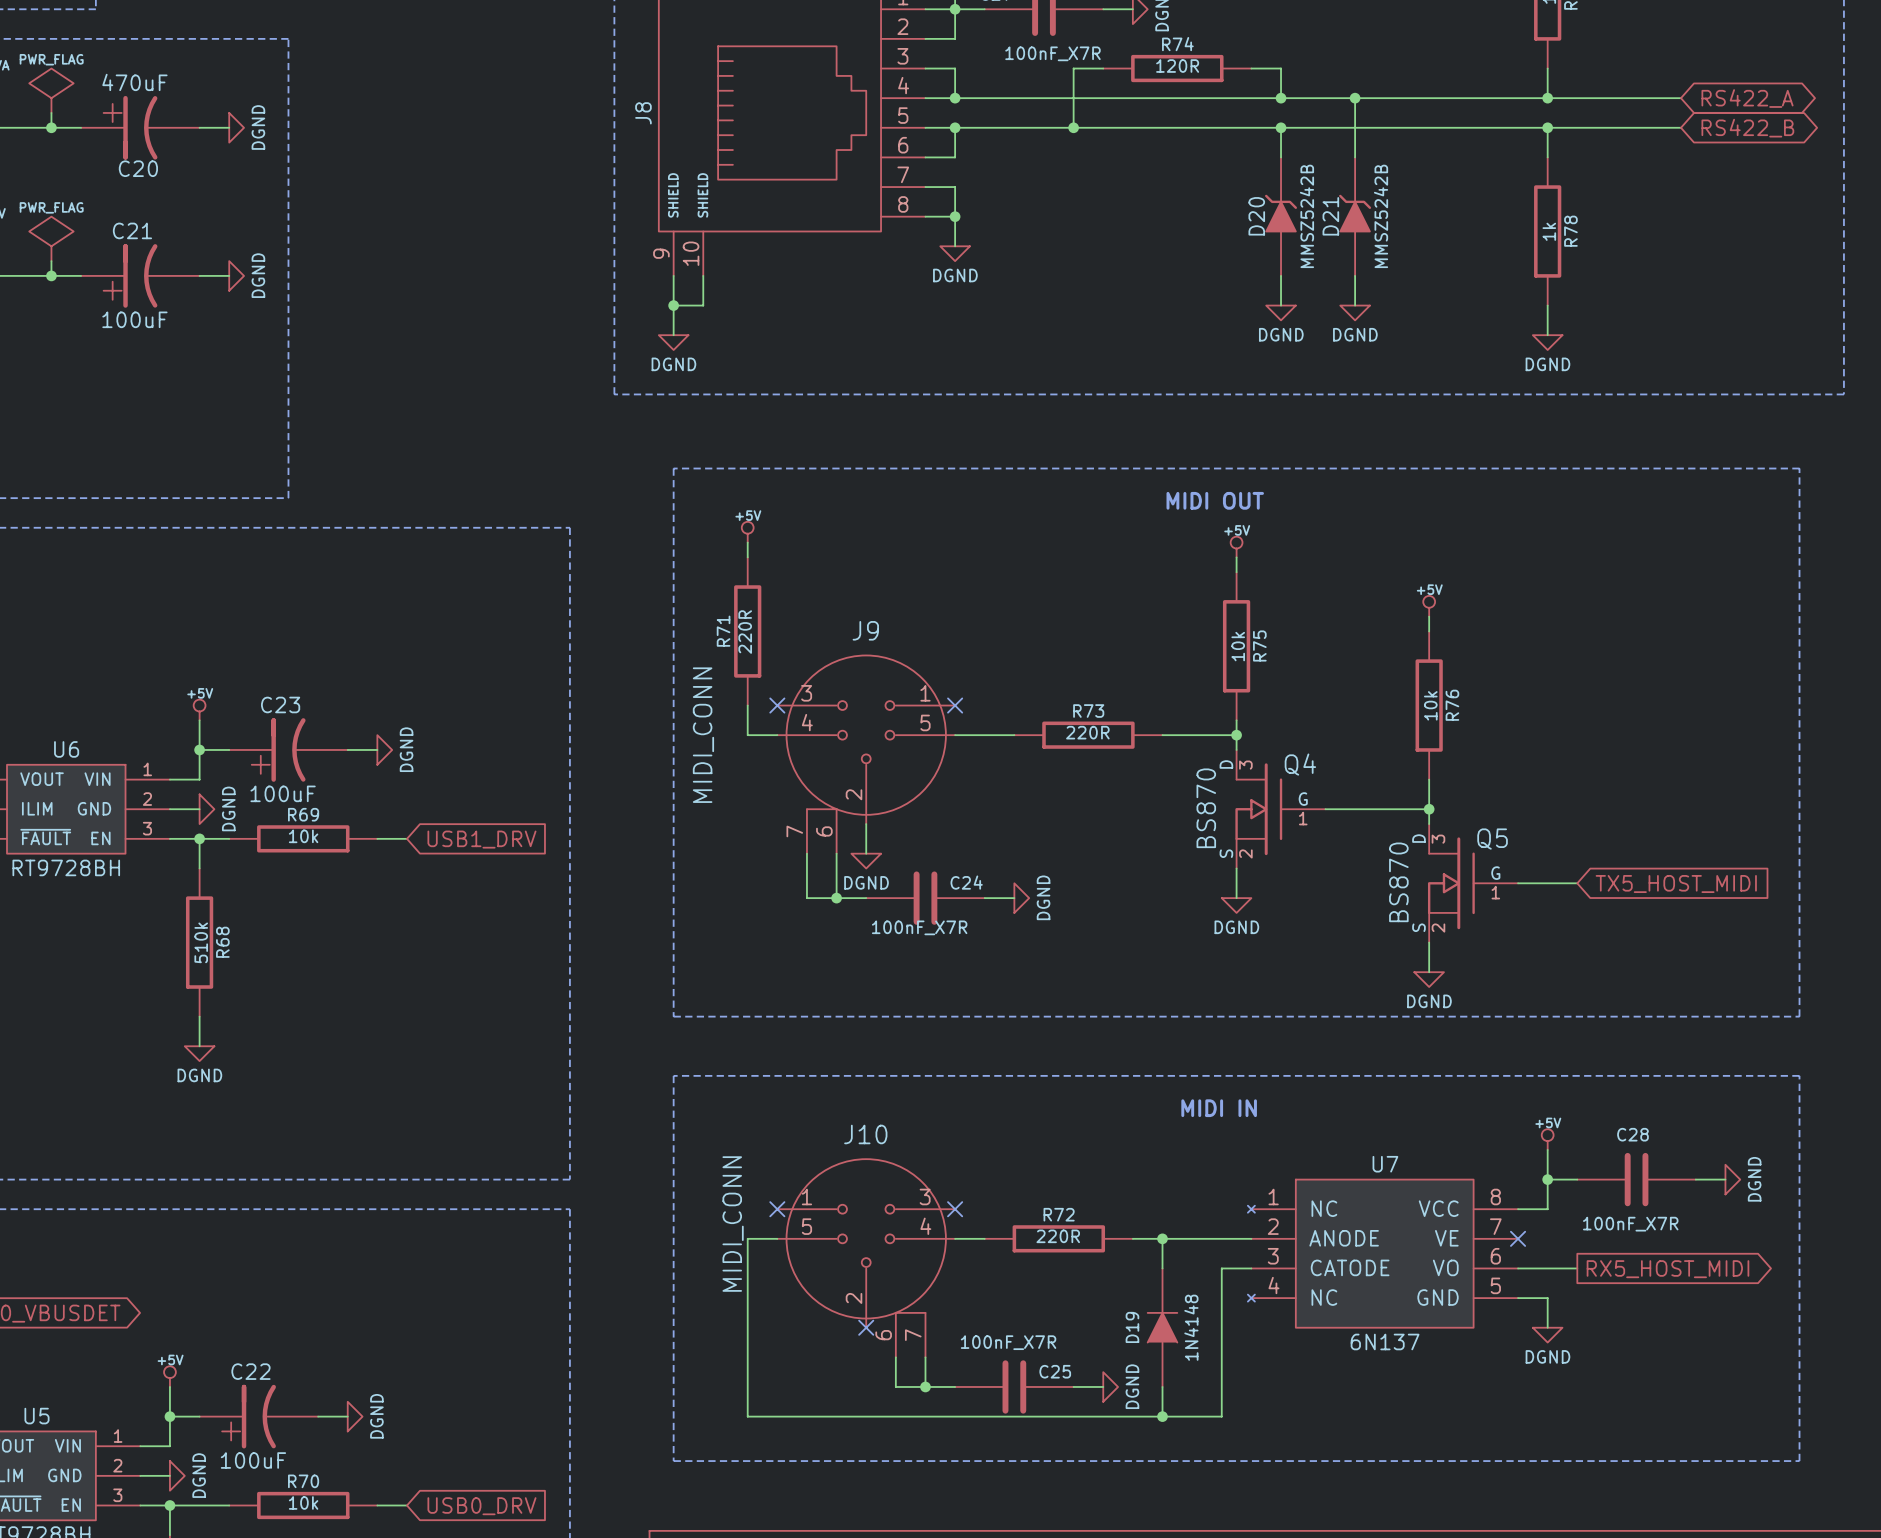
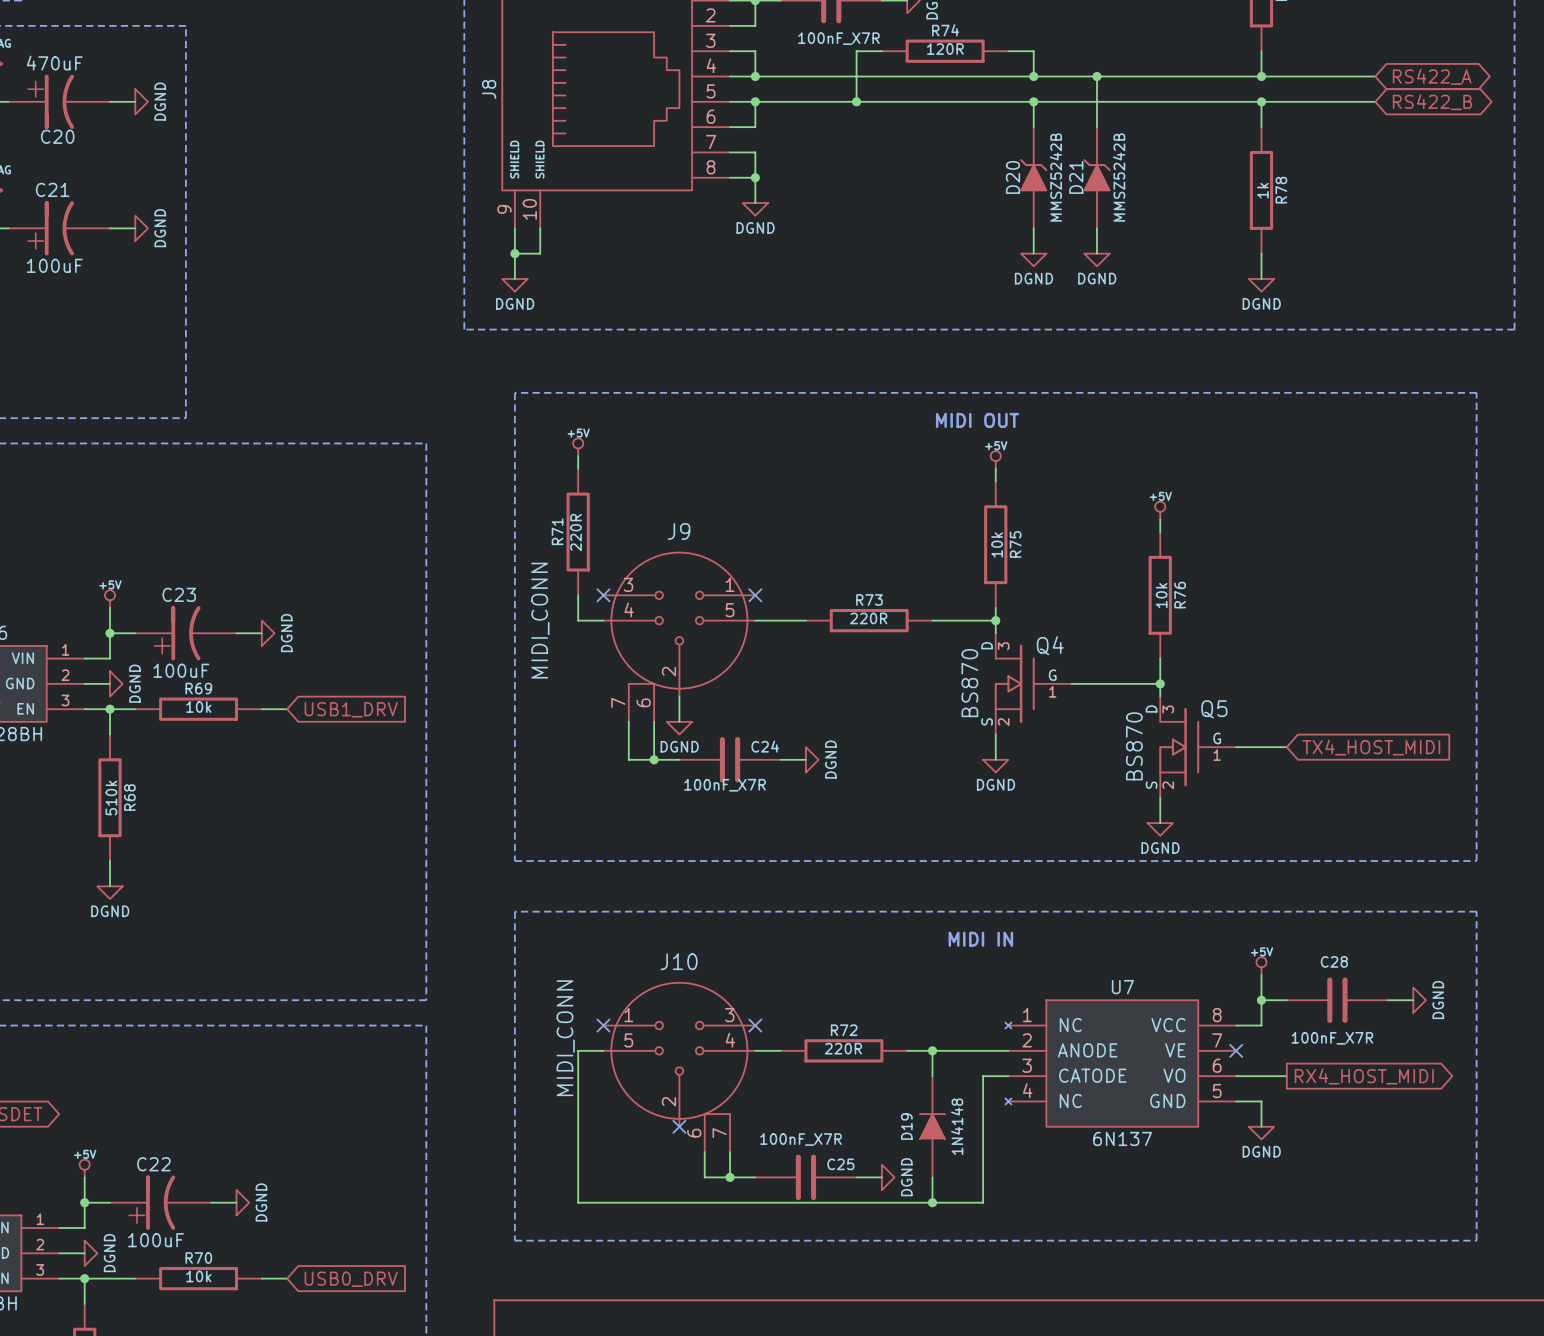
global label: TX5_HOST_MIDI (1676, 884) -> TX4_HOST_MIDI (1371, 747)
global label: RX5_HOST_MIDI (1667, 1269) -> RX4_HOST_MIDI (1364, 1076)

